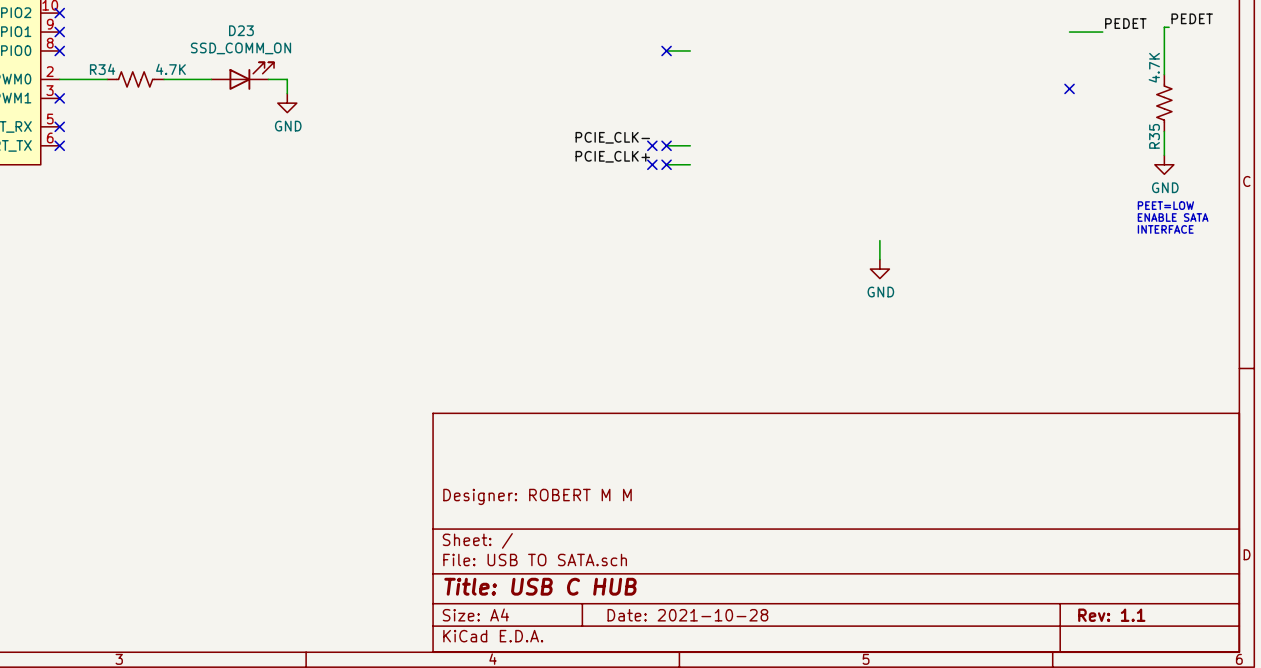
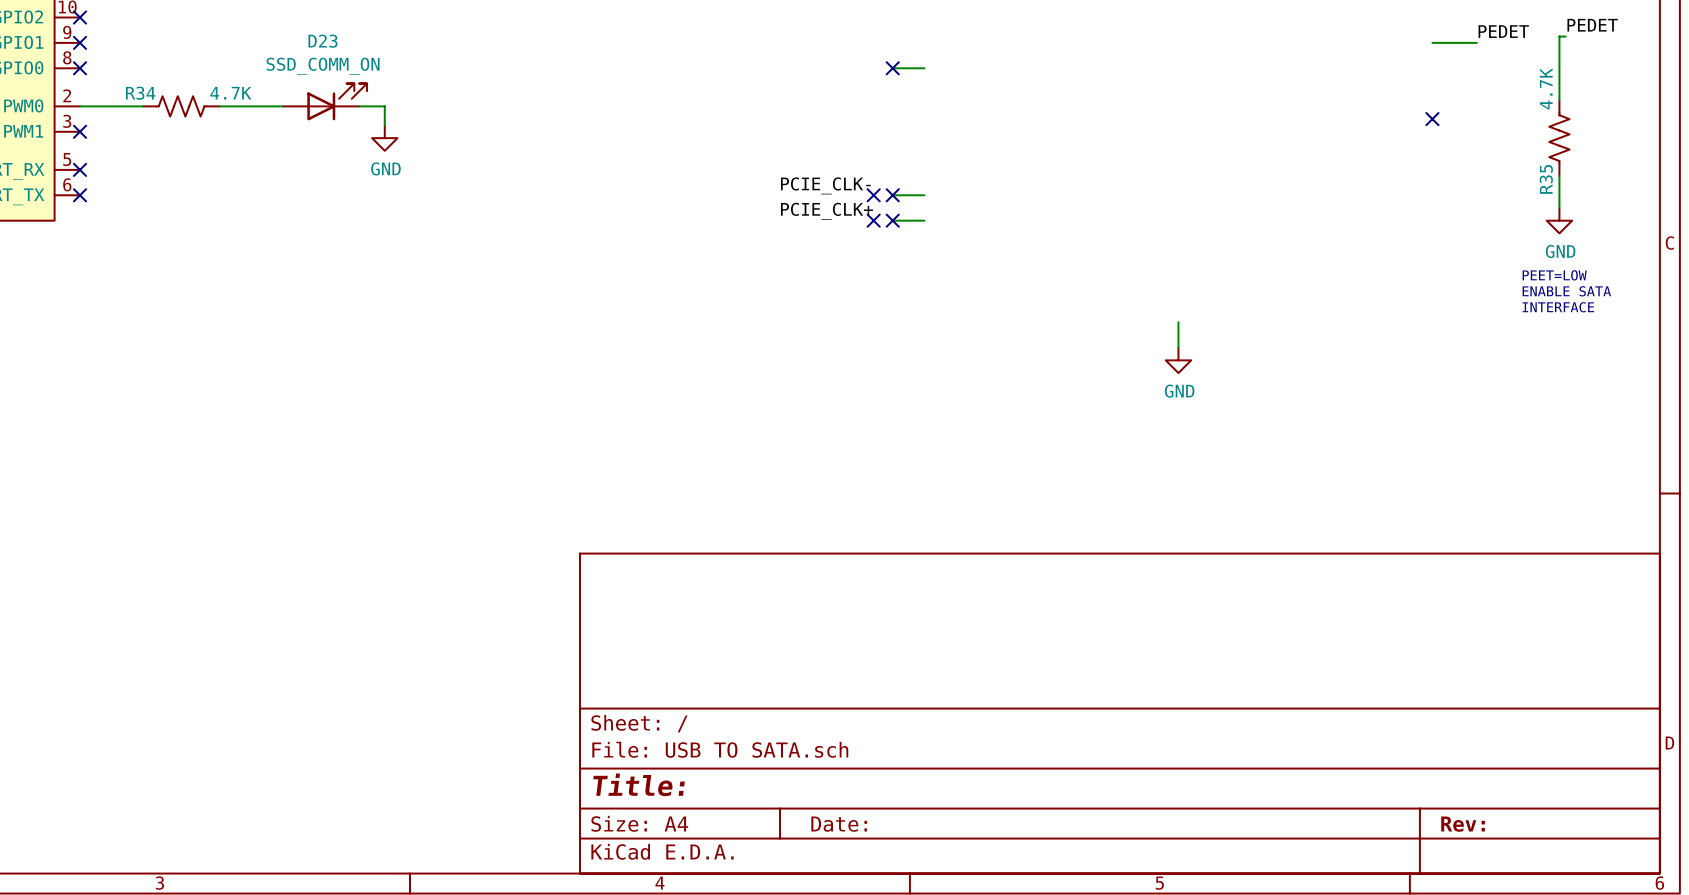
title block: Designer: ROBERT M M (537, 496) -> none
title block: Title: USB C HUB (540, 586) -> Title: (639, 784)
title block: Date: 2021-10-28 (687, 615) -> Date: (839, 824)
title block: Rev: 1.1 (1111, 615) -> Rev: (1463, 824)

